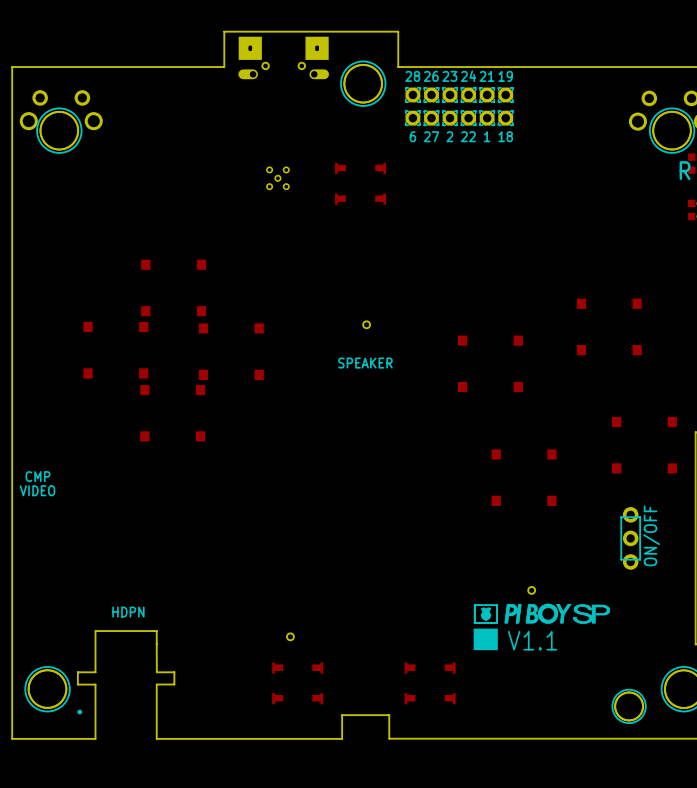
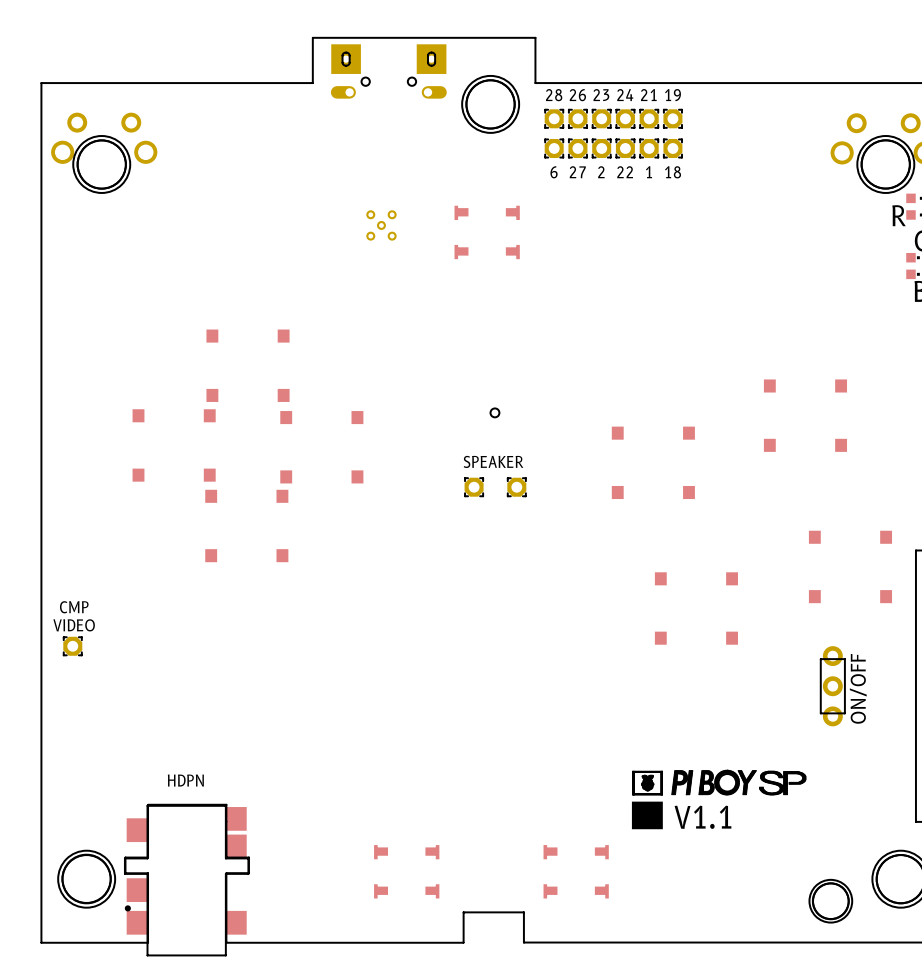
part: none -> (474, 487)
part: none -> (516, 487)
part: none -> (72, 646)
hole: (531, 590) -> none
hole: (290, 636) -> none
part: none -> (186, 880)

